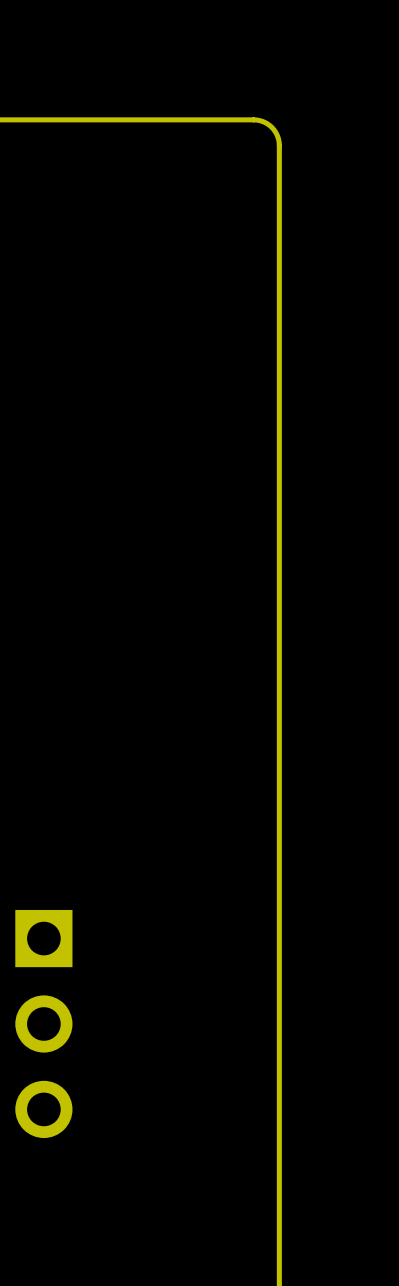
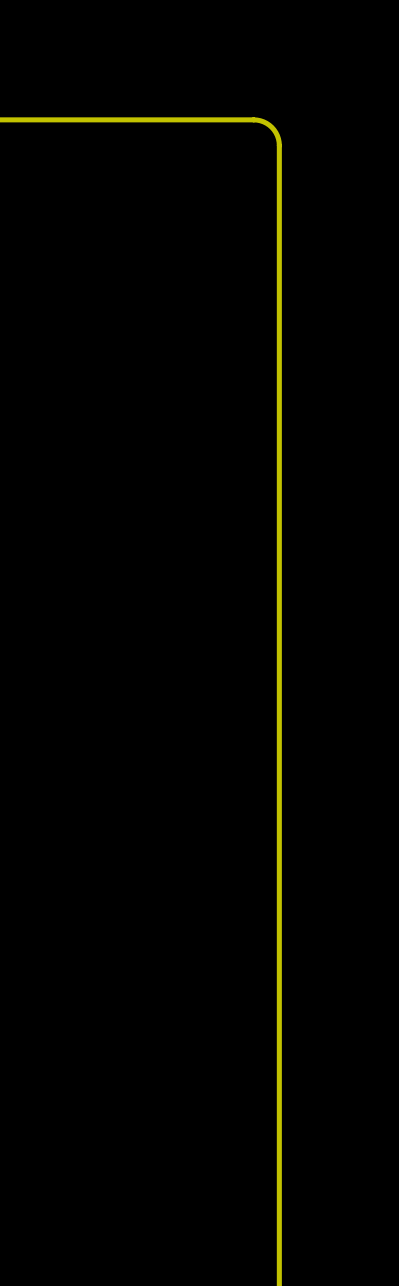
part: (43, 1023) -> none

